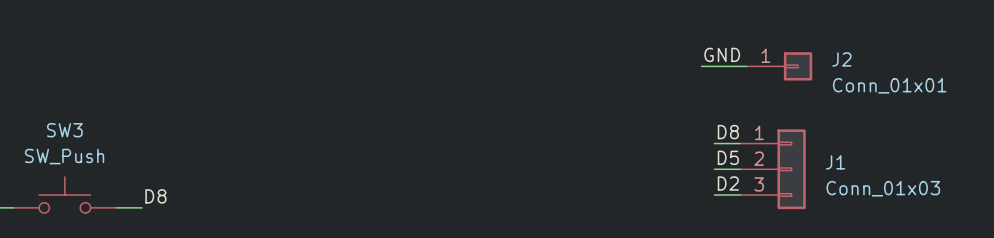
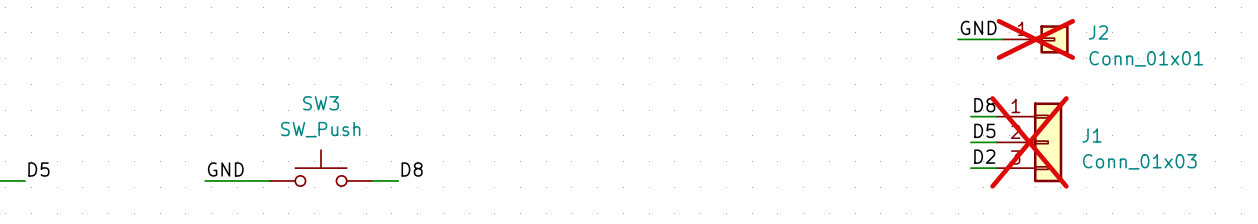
J2 do-not-place cross: none -> (1035, 39)
J1 do-not-place cross: none -> (1029, 142)

